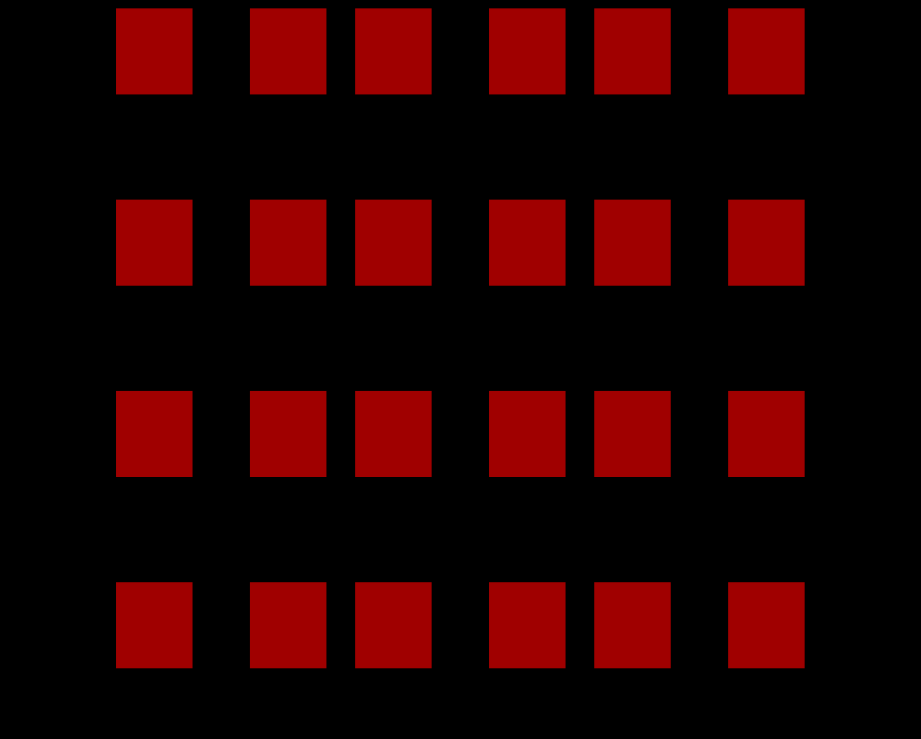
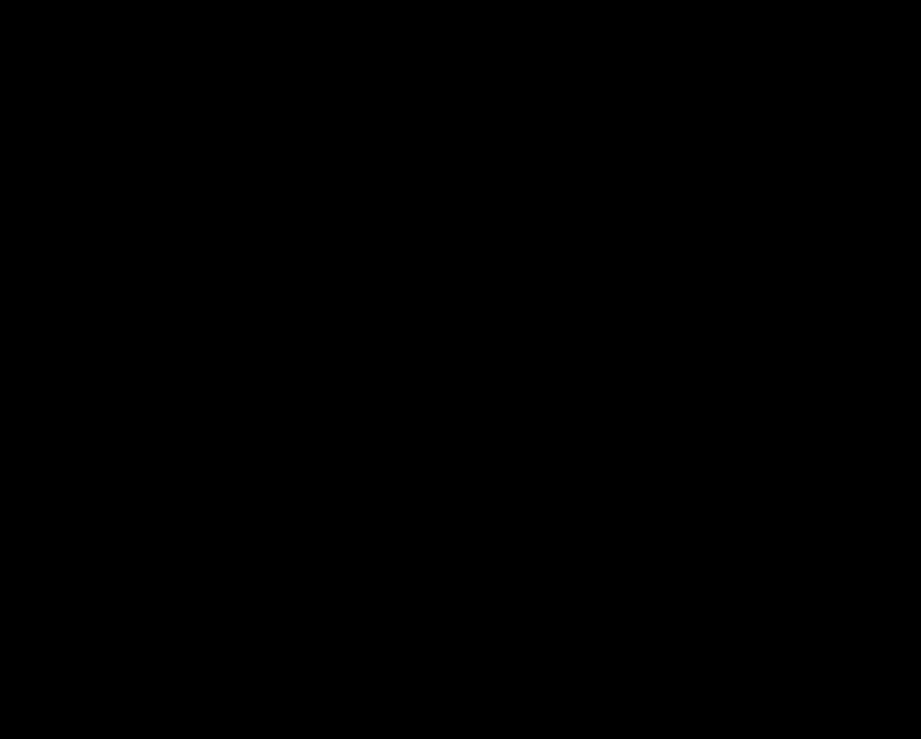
part: (221, 51) -> none
part: (460, 51) -> none
part: (699, 51) -> none
part: (221, 242) -> none
part: (460, 242) -> none
part: (699, 242) -> none
part: (221, 433) -> none
part: (460, 433) -> none
part: (699, 433) -> none
part: (221, 625) -> none
part: (460, 625) -> none
part: (699, 625) -> none

